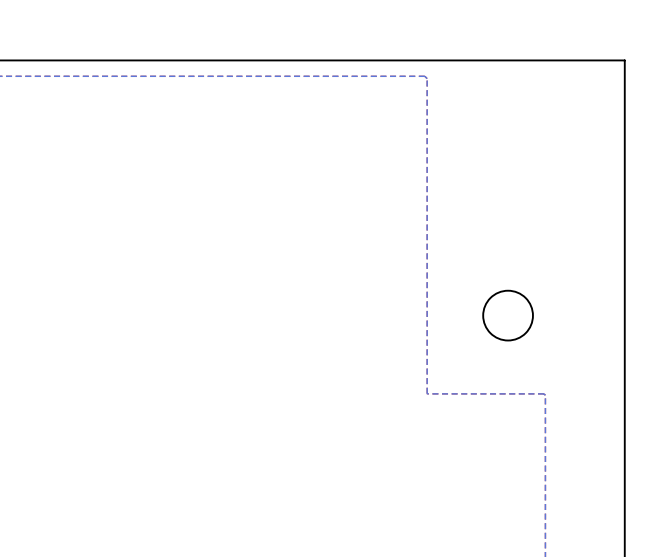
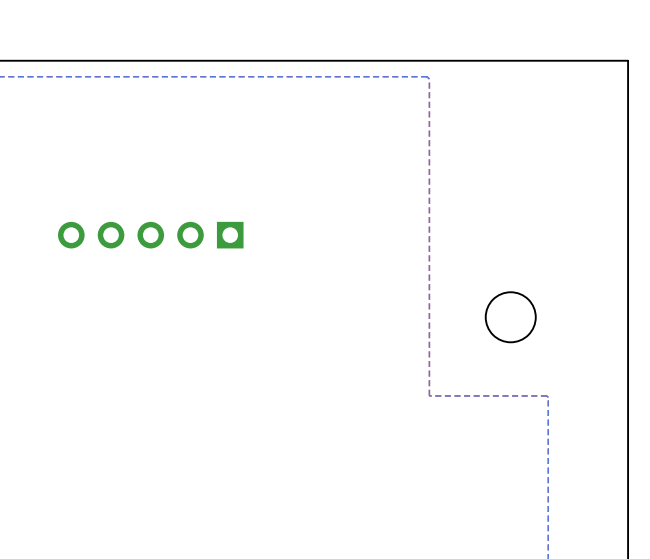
part: none -> (150, 235)

